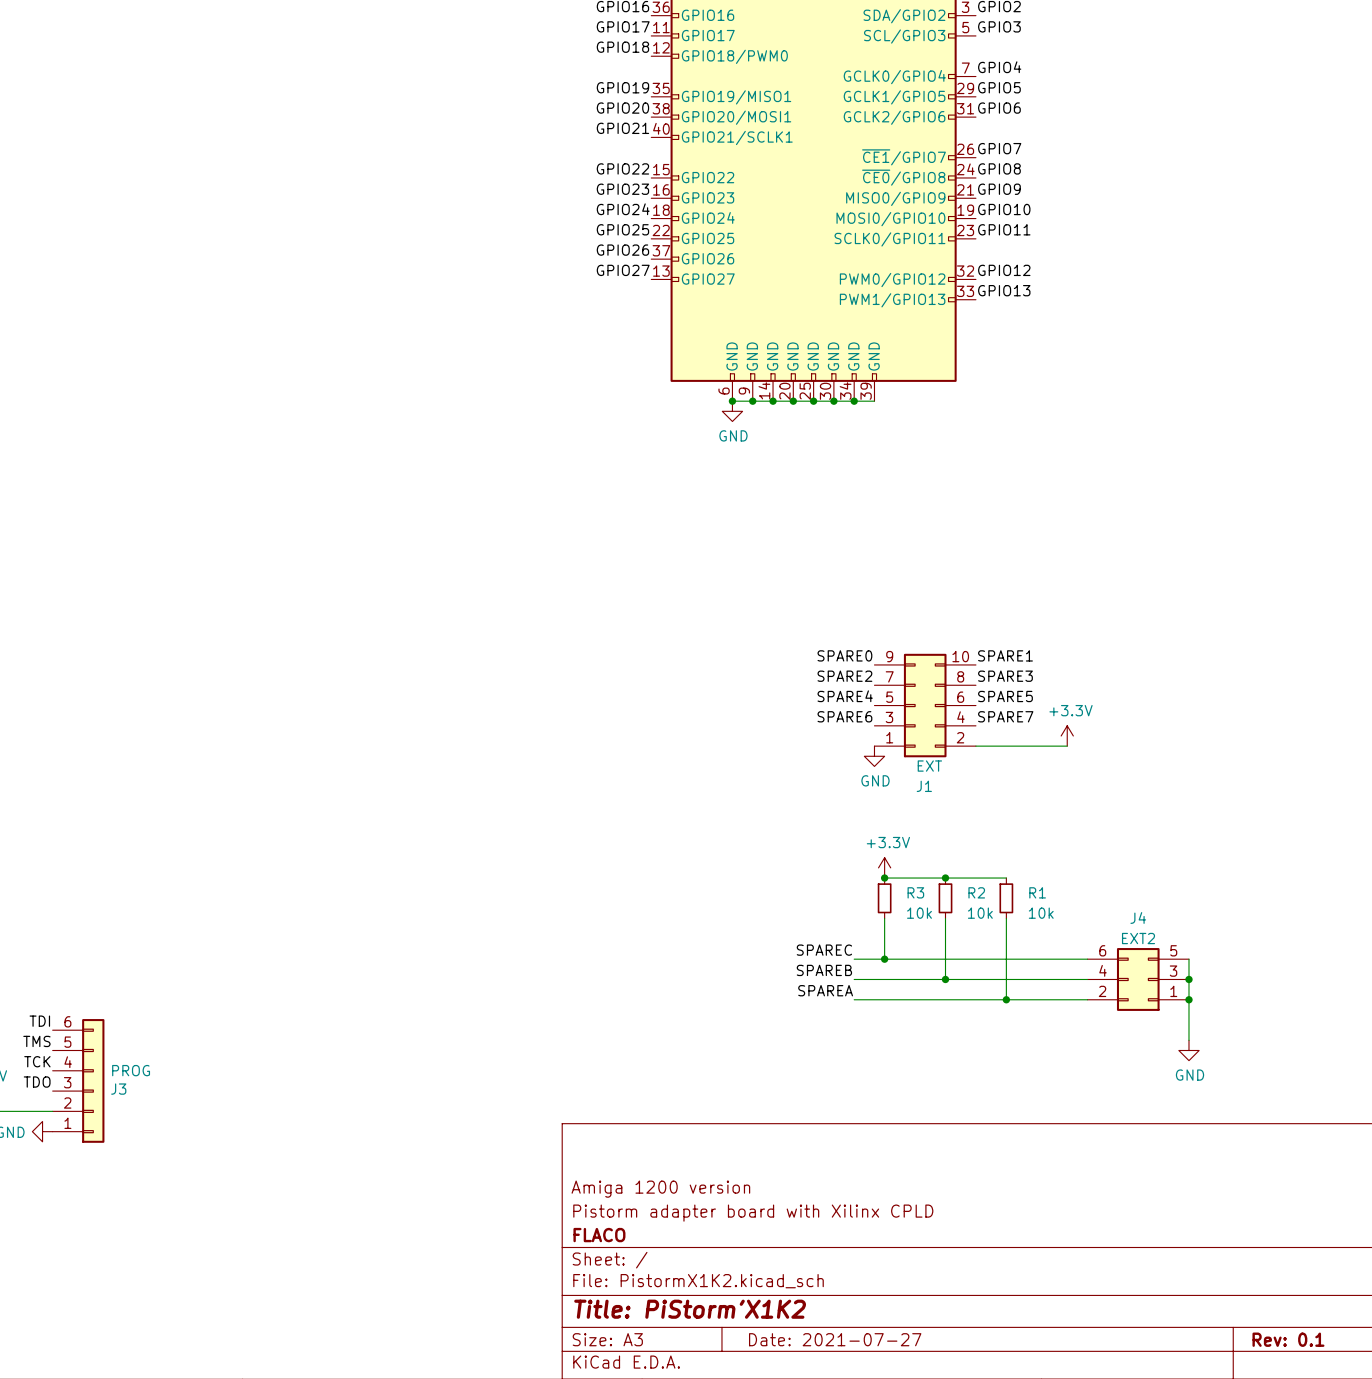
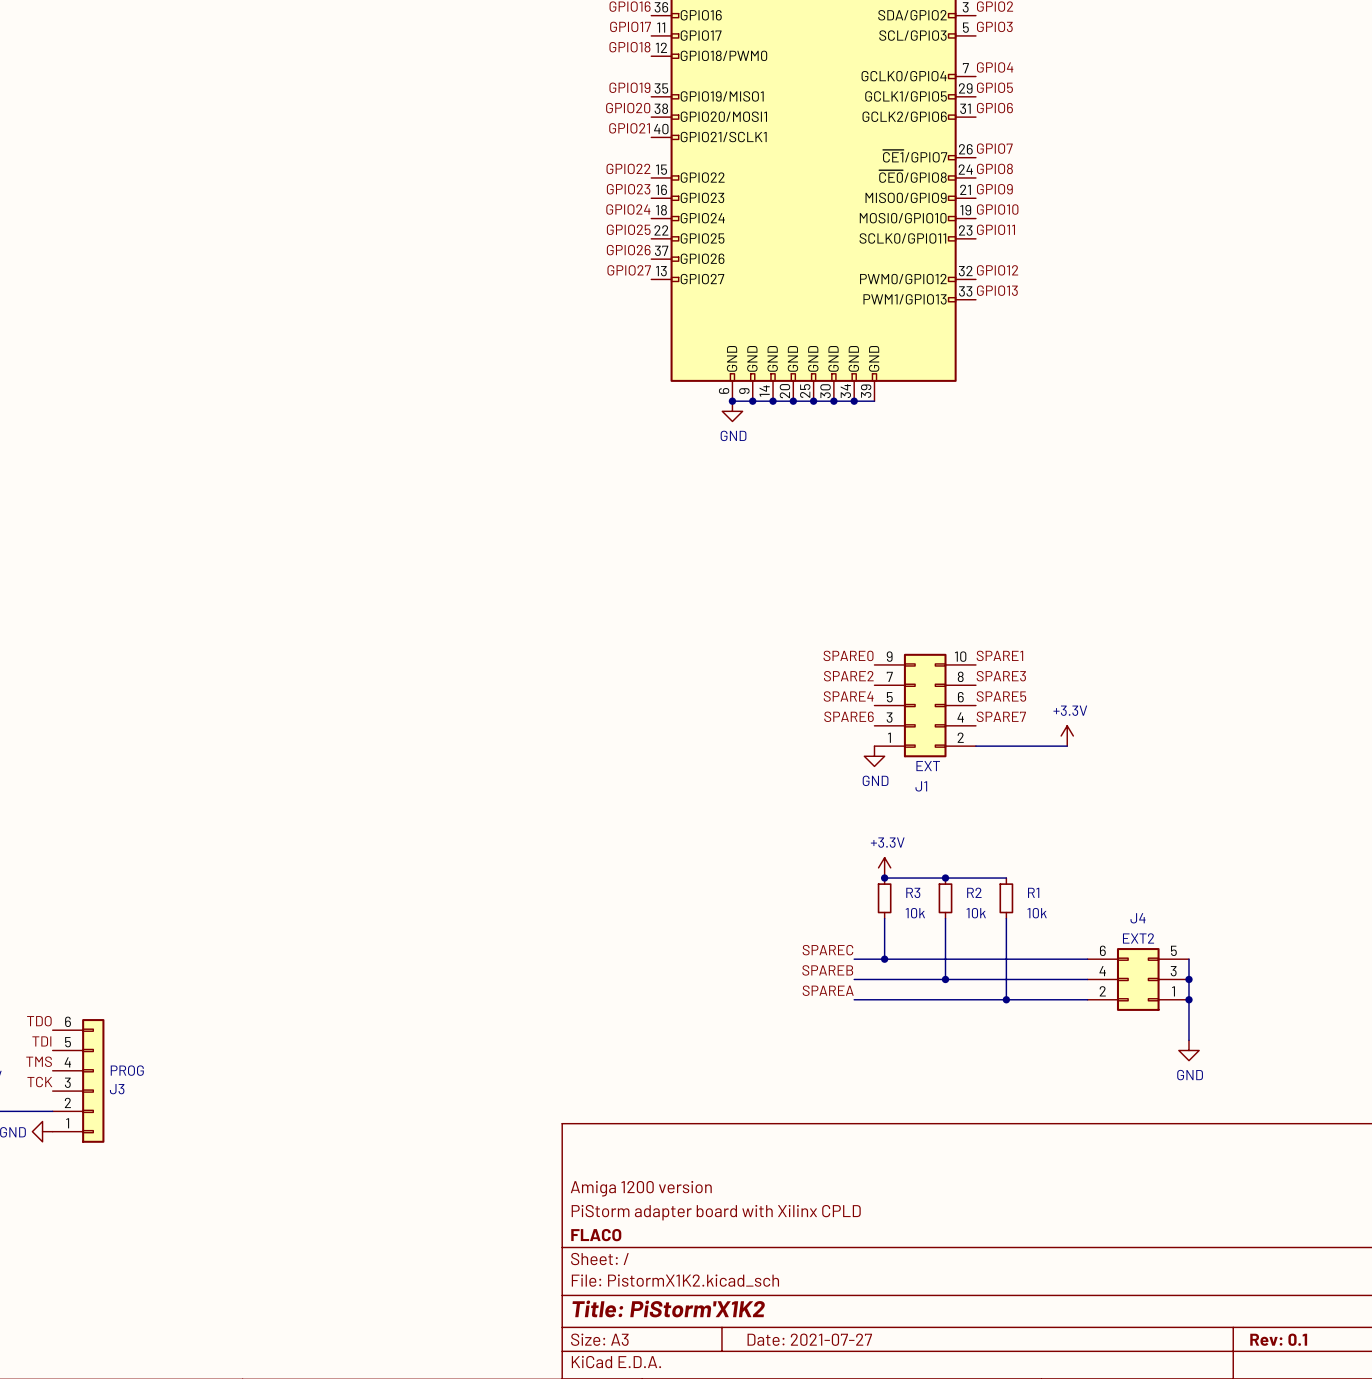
label: TDI (39, 1021) -> TDO (39, 1021)
label: TMS (36, 1041) -> TDI (41, 1041)
label: TCK (37, 1061) -> TMS (39, 1061)
label: TDO (37, 1082) -> TCK (39, 1082)
title block: Pistorm adapter board with Xilinx CPLD (753, 1213) -> PiStorm adapter board with Xilinx CPLD (716, 1212)

